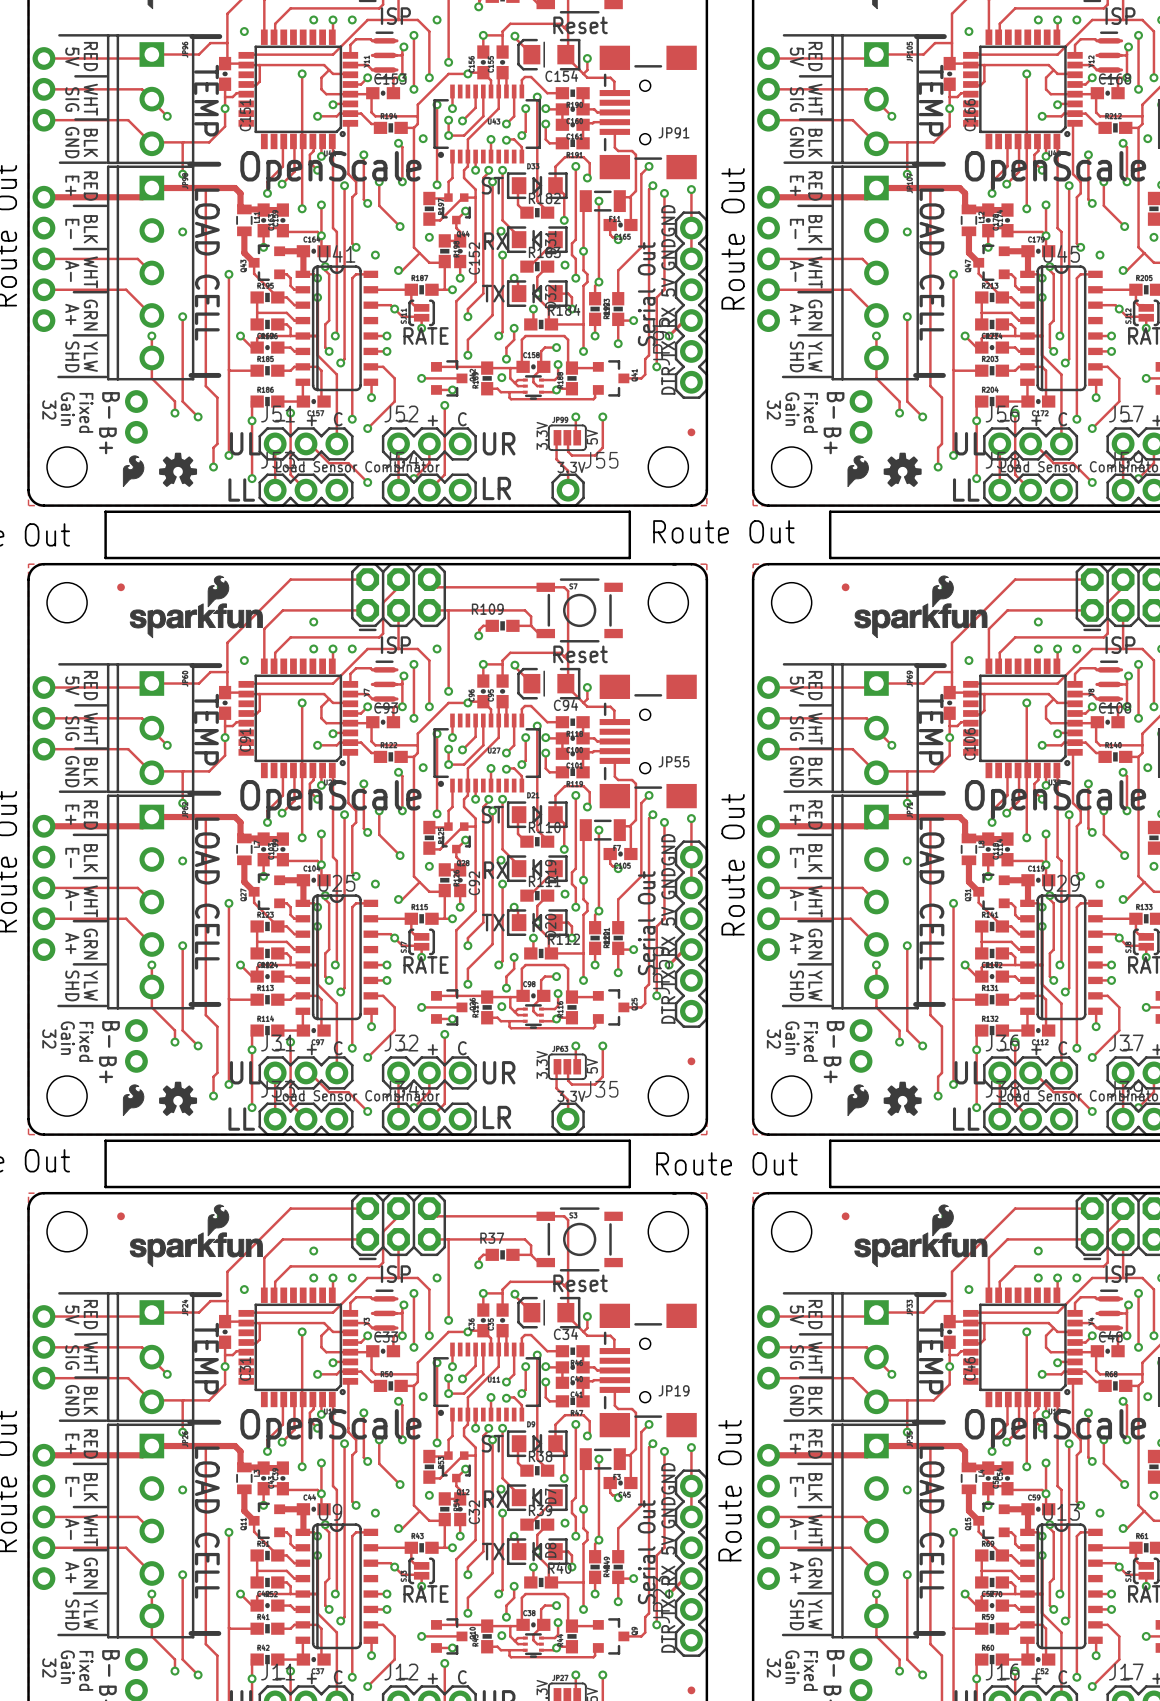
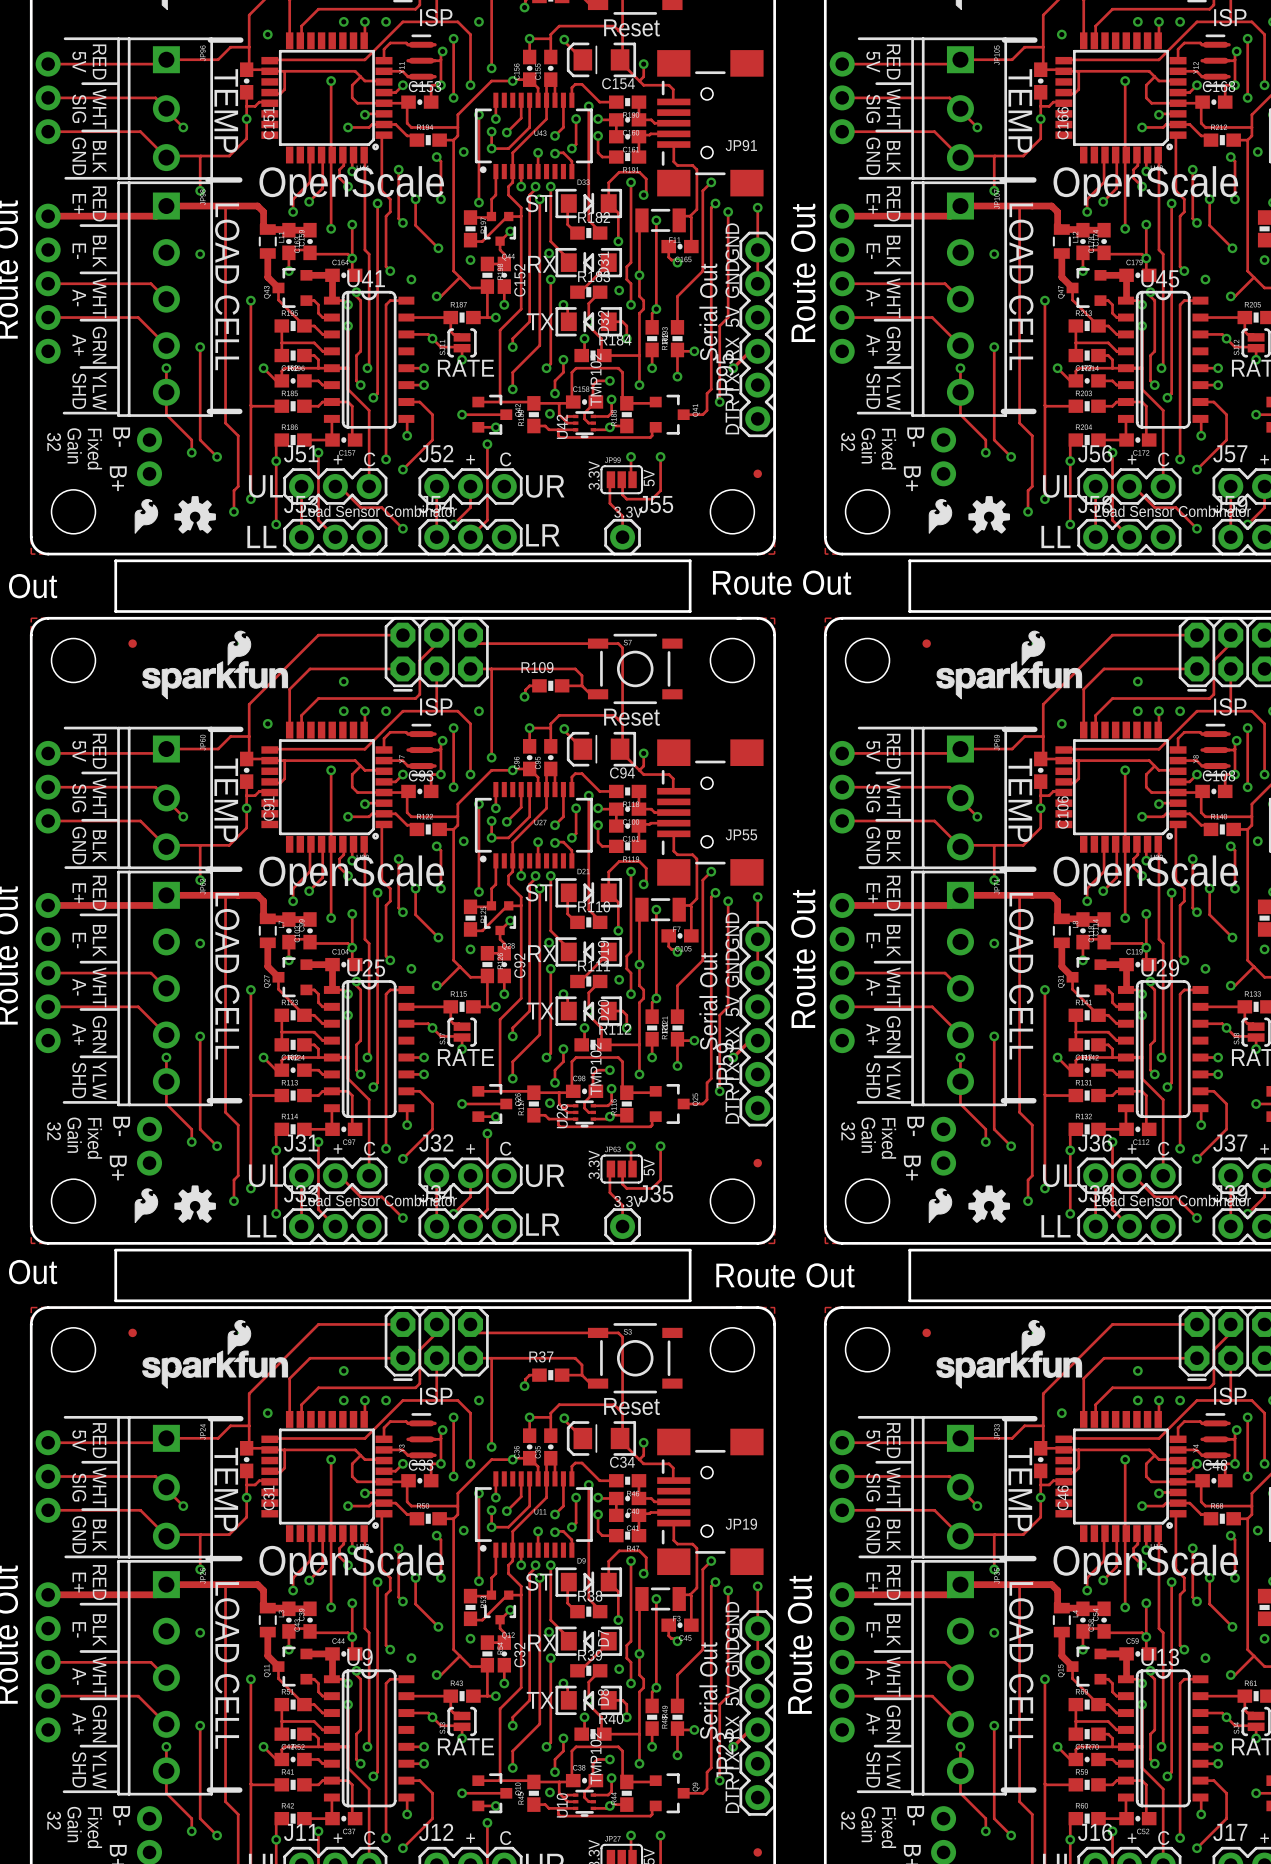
U42 value: none -> TMP102 (596, 379)
U42 name: none -> U42 (562, 426)
U26 value: none -> TMP102 (596, 1069)
U26 name: none -> U26 (562, 1116)
U10 value: none -> TMP102 (596, 1758)
U10 name: none -> U10 (562, 1805)

